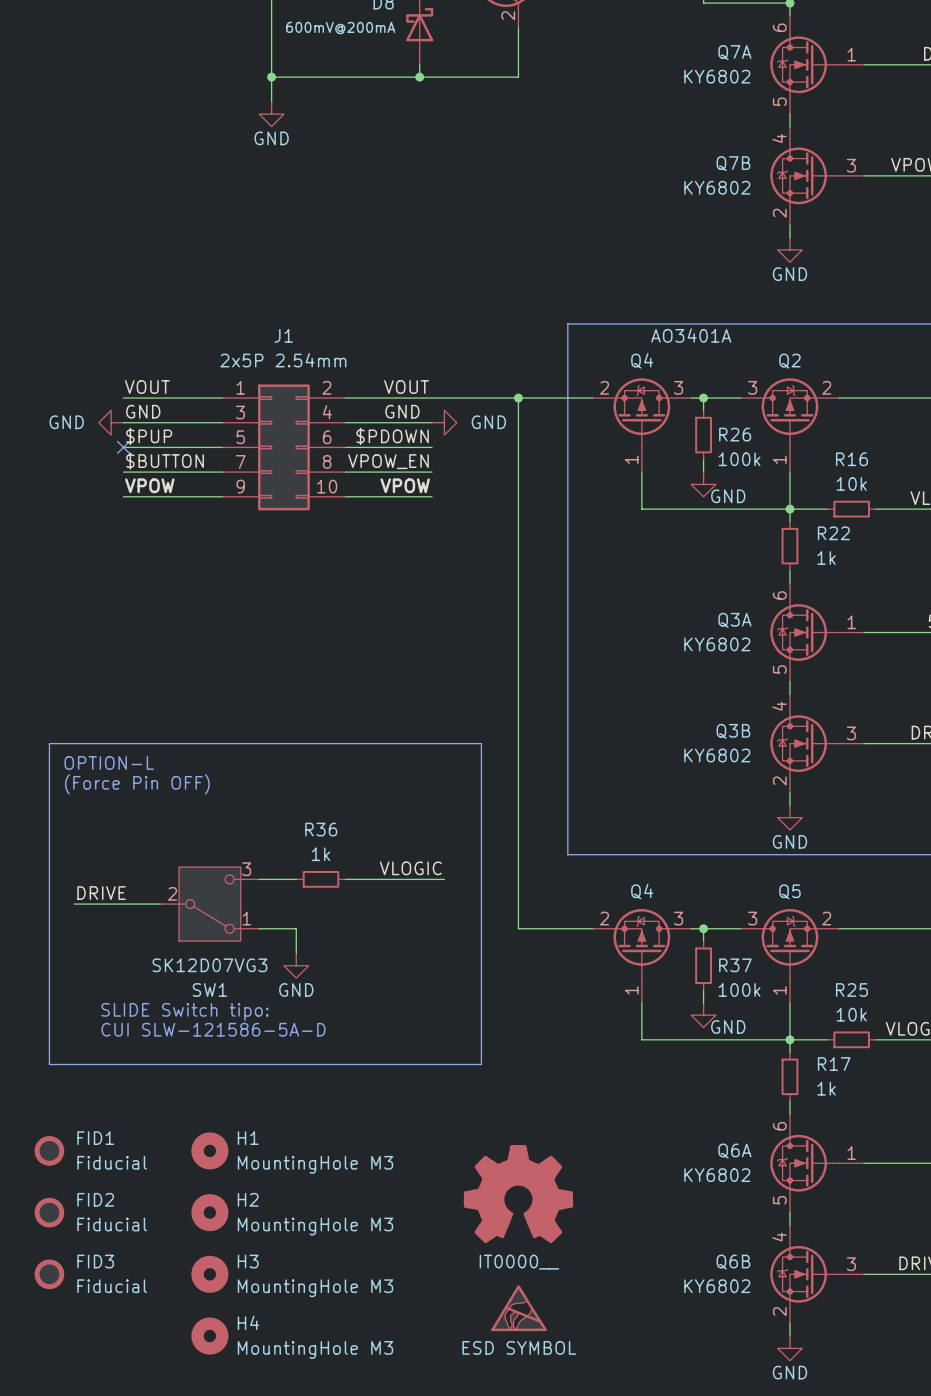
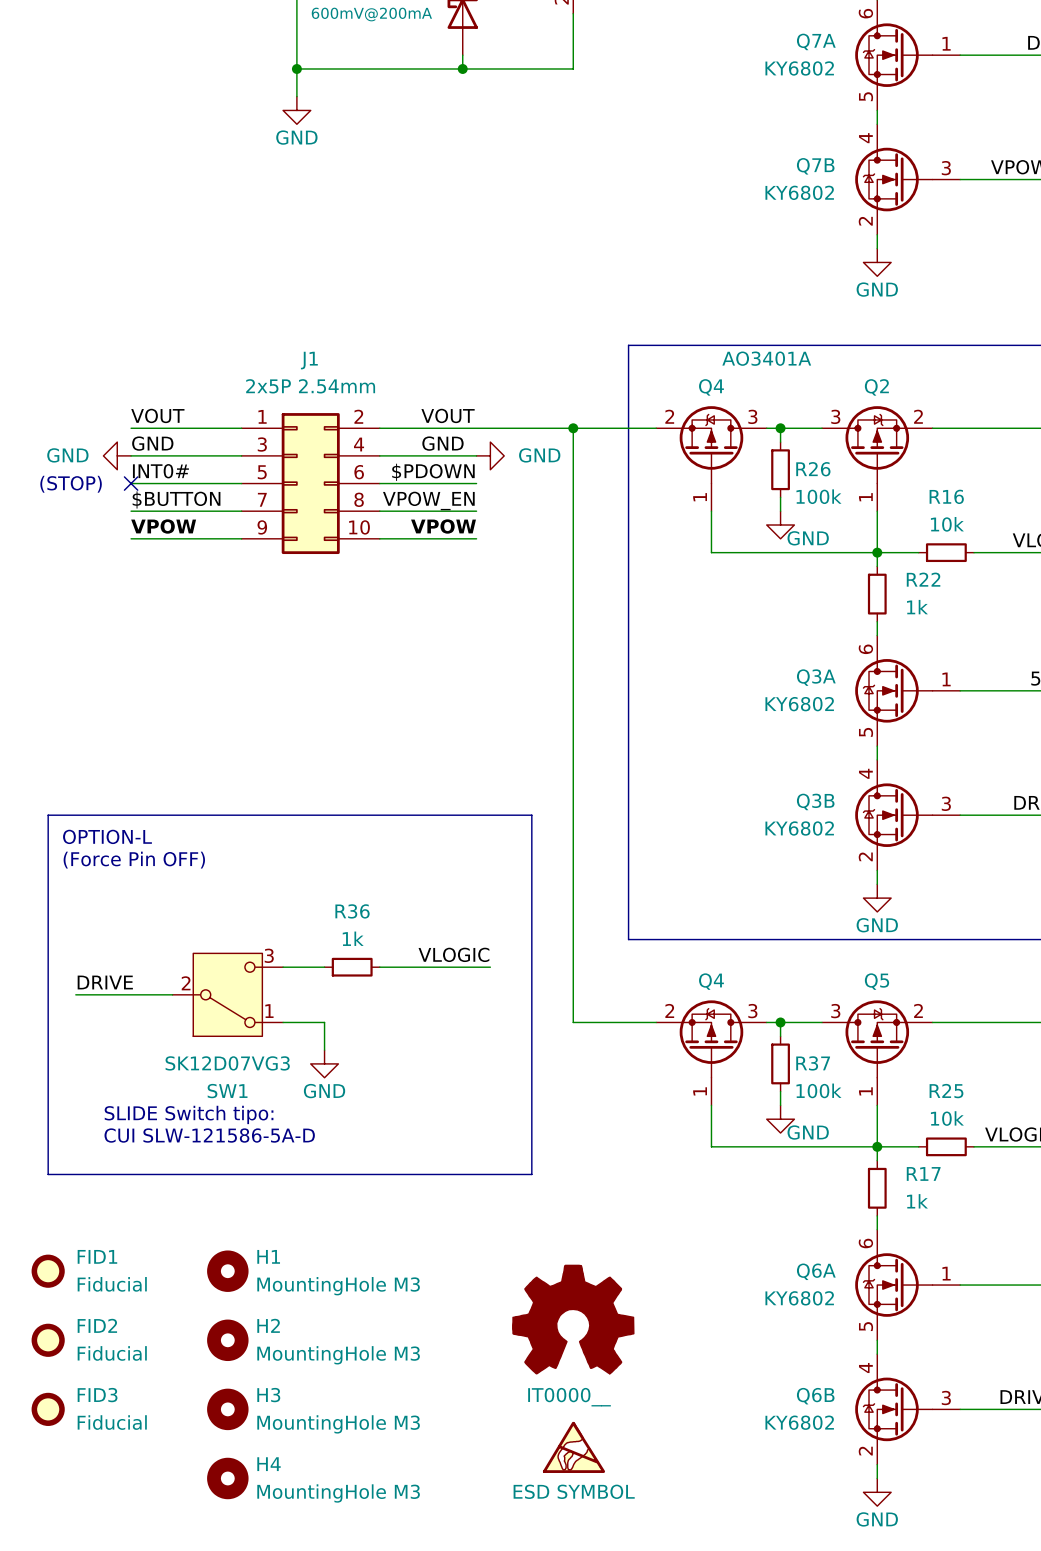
label: $PUP (149, 436) -> INT0# (160, 471)
text: none -> (STOP) (71, 484)

